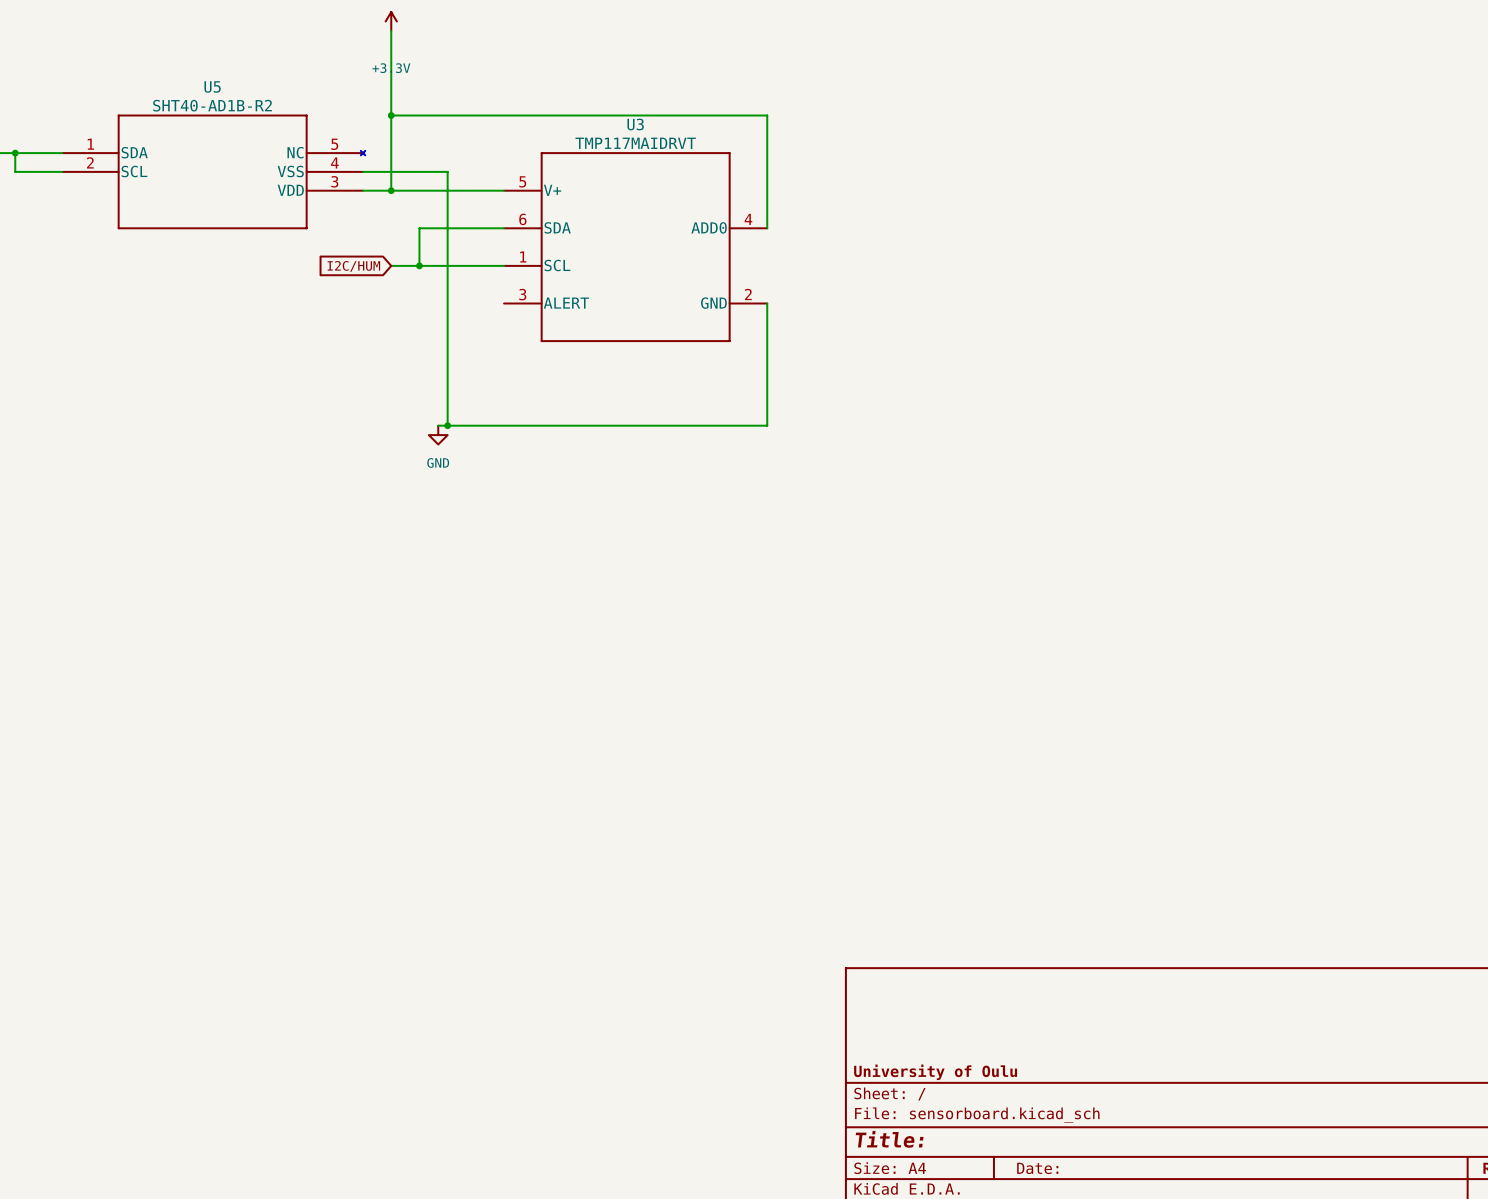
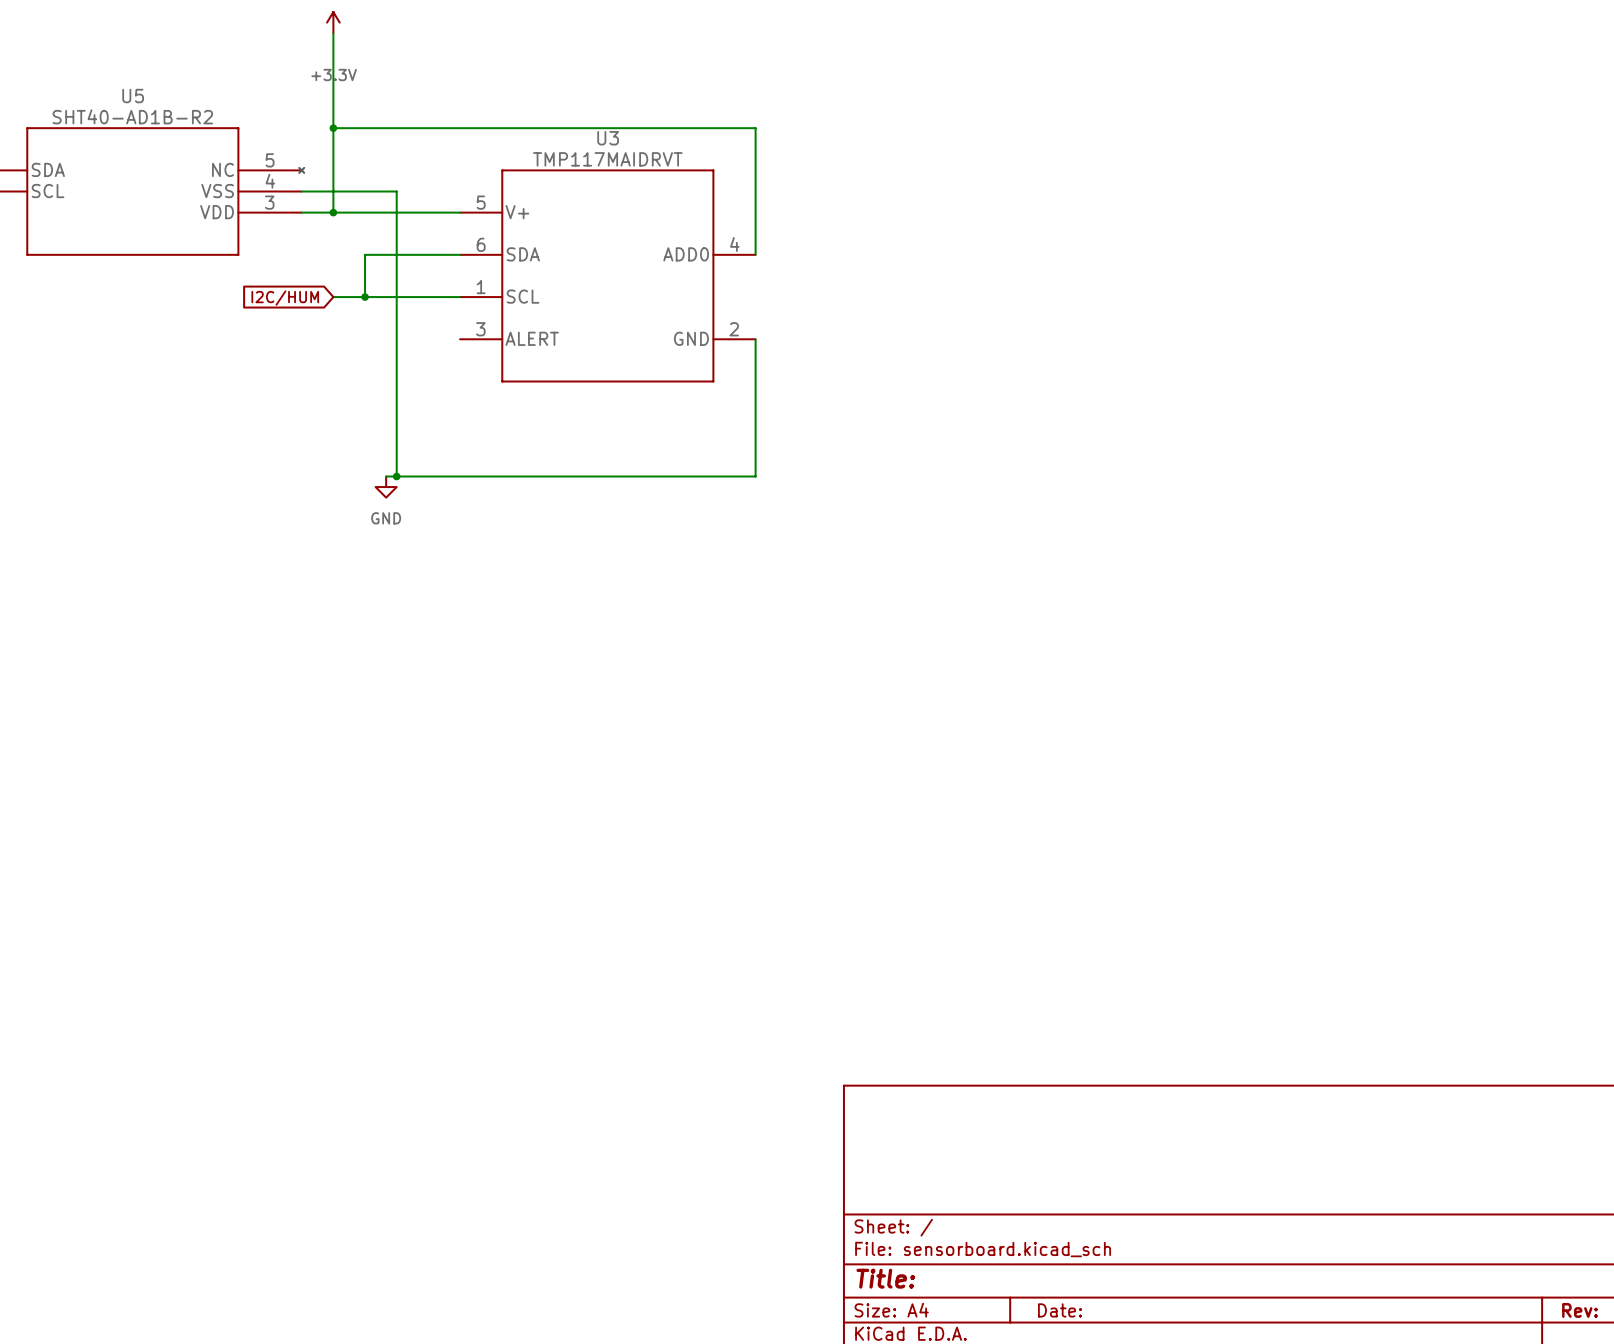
title block: University of Oulu (935, 1072) -> none

